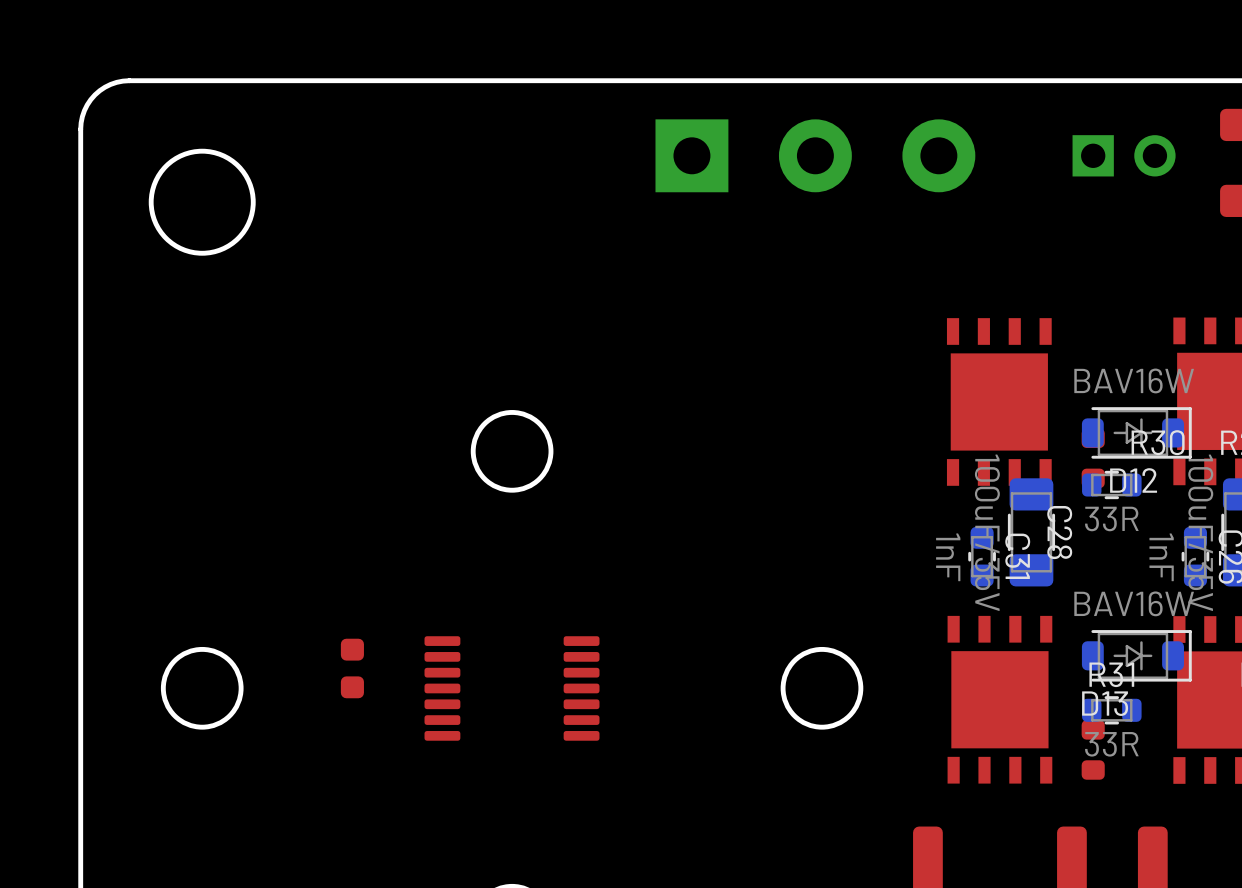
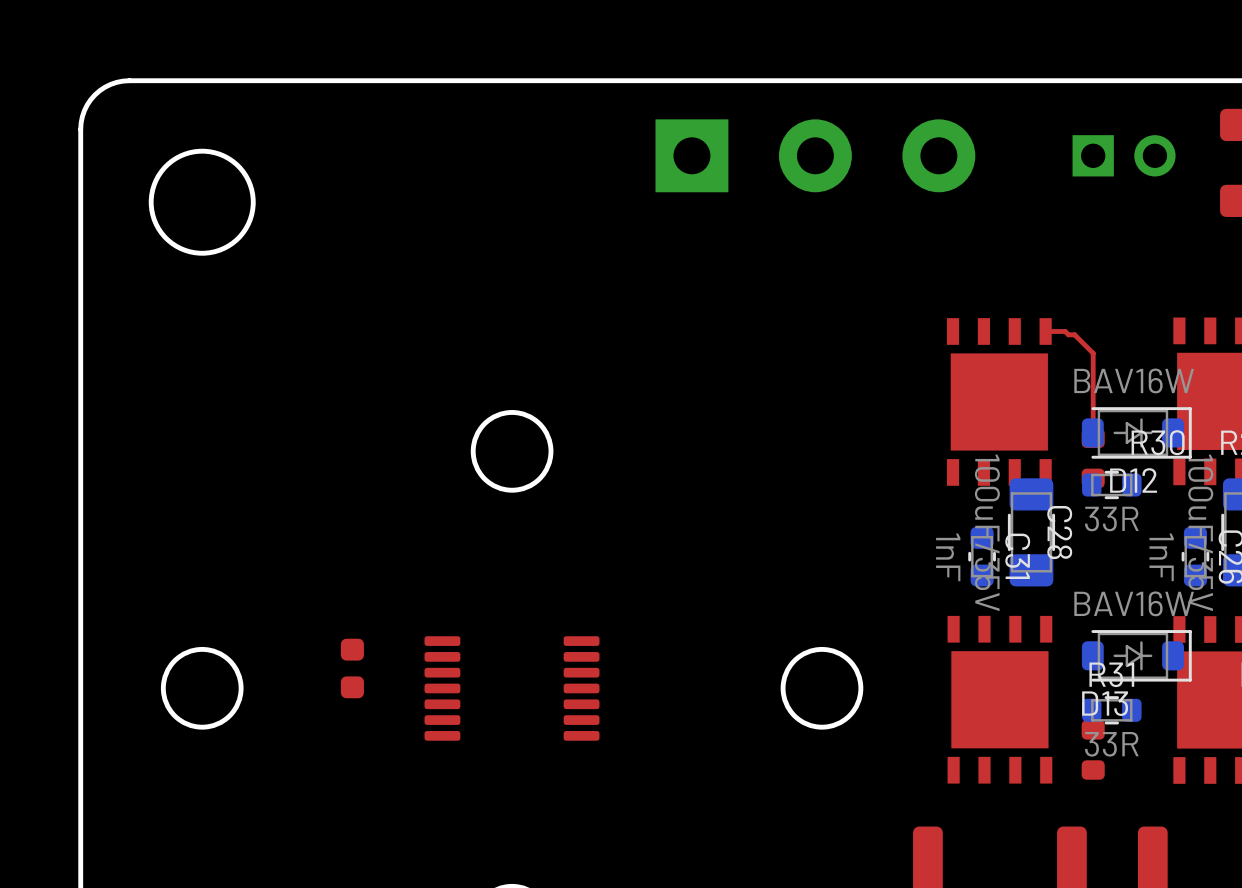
top track: none -> (1045, 331) (1065, 331) (1068, 334) (1074, 334) (1093, 353) (1093, 438)

